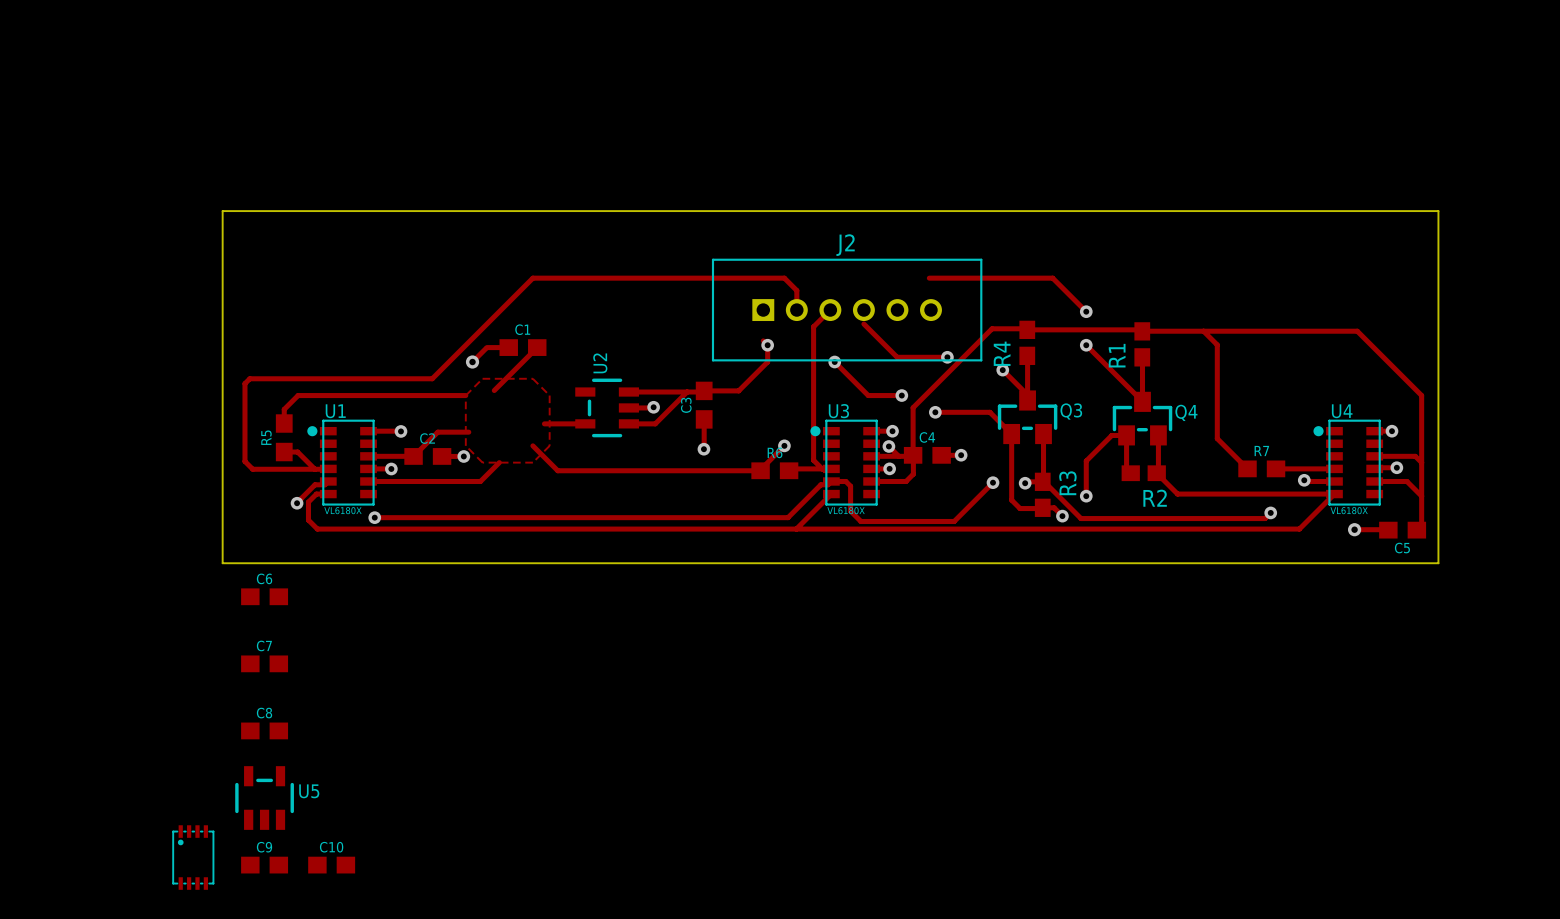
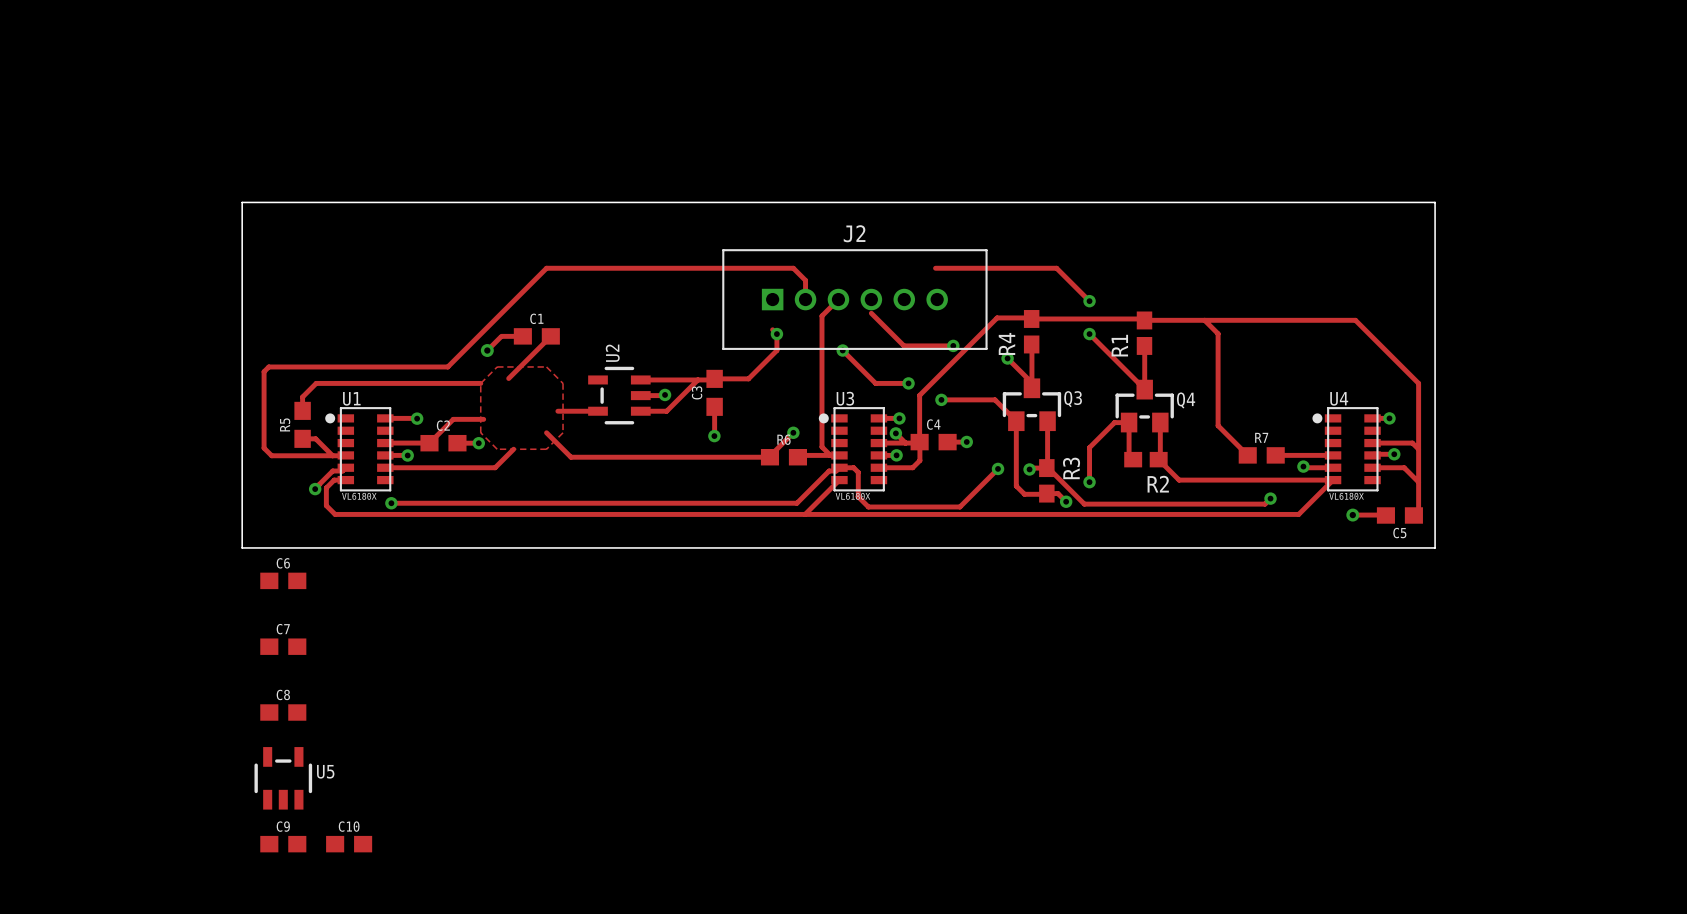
part: (193, 857) -> none

